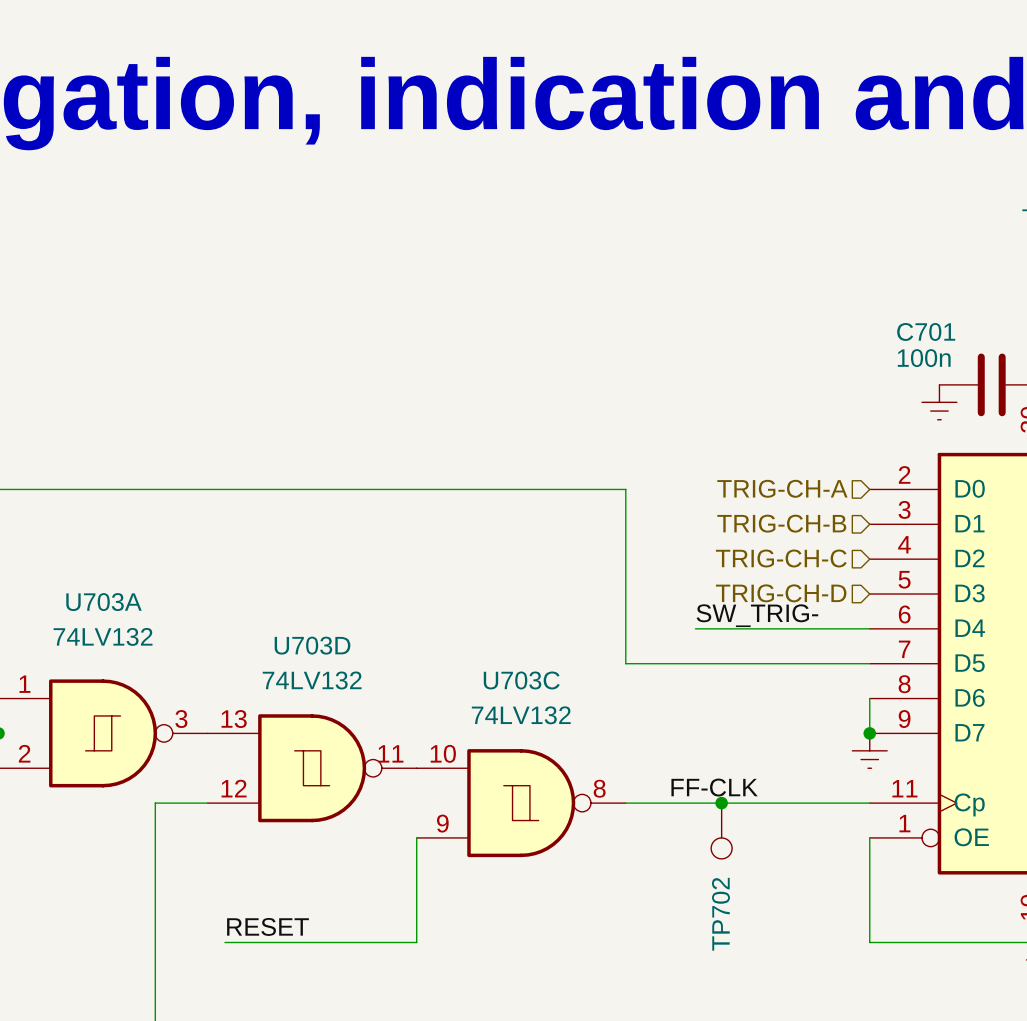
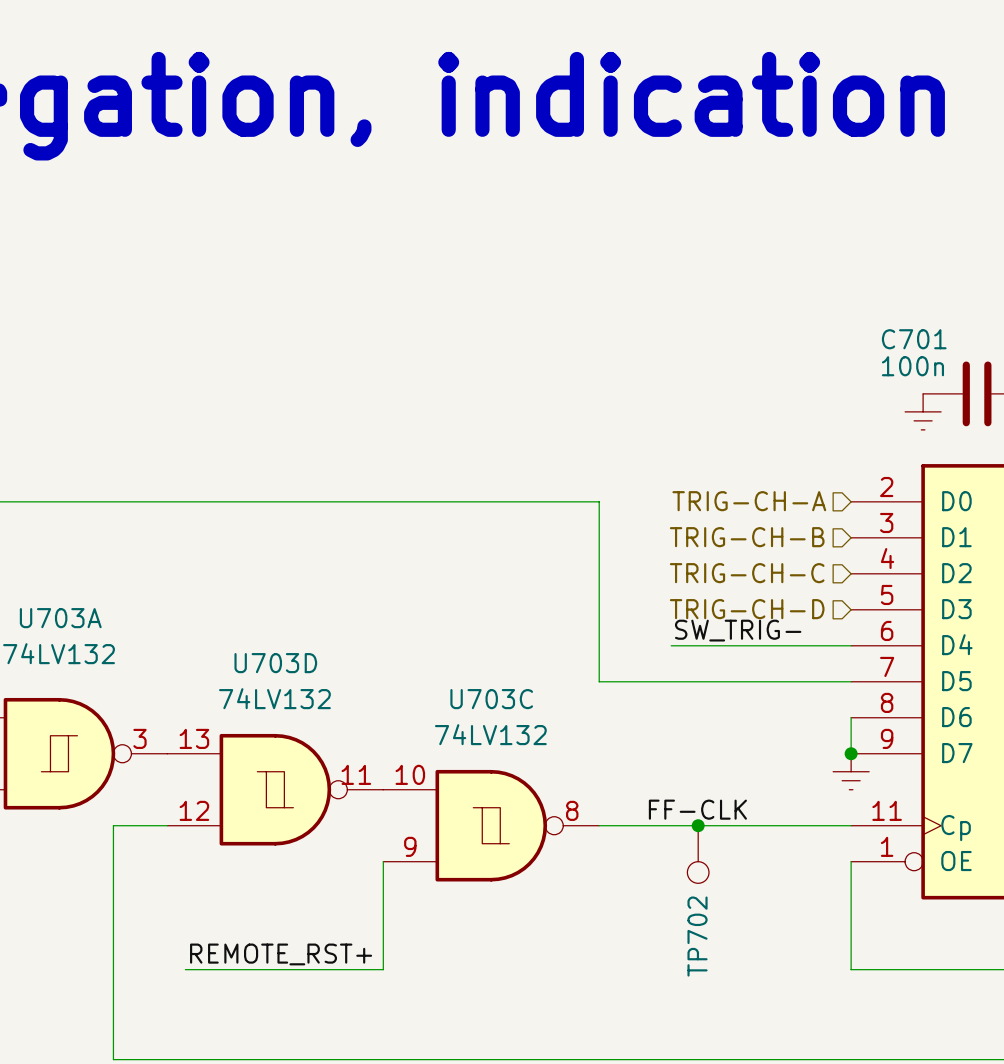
label: RESET (267, 926) -> REMOTE_RST+ (281, 954)

